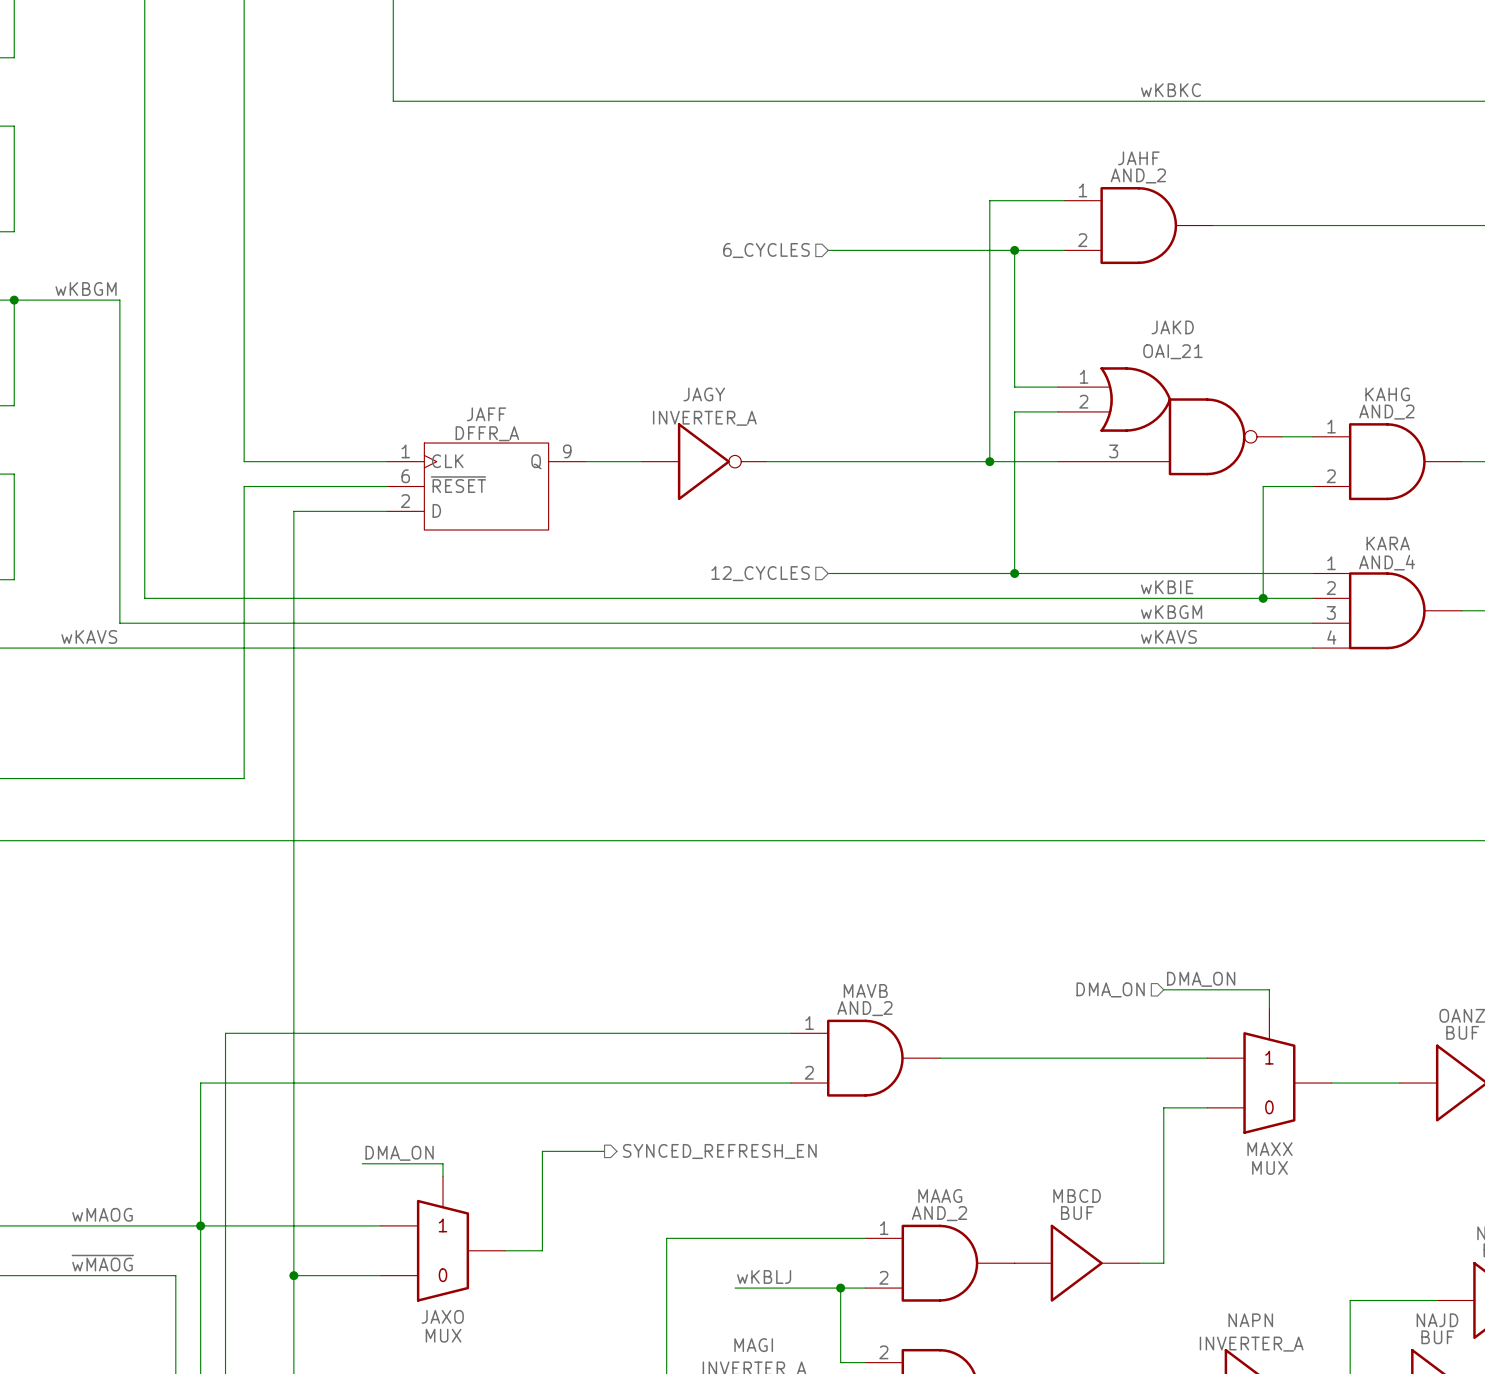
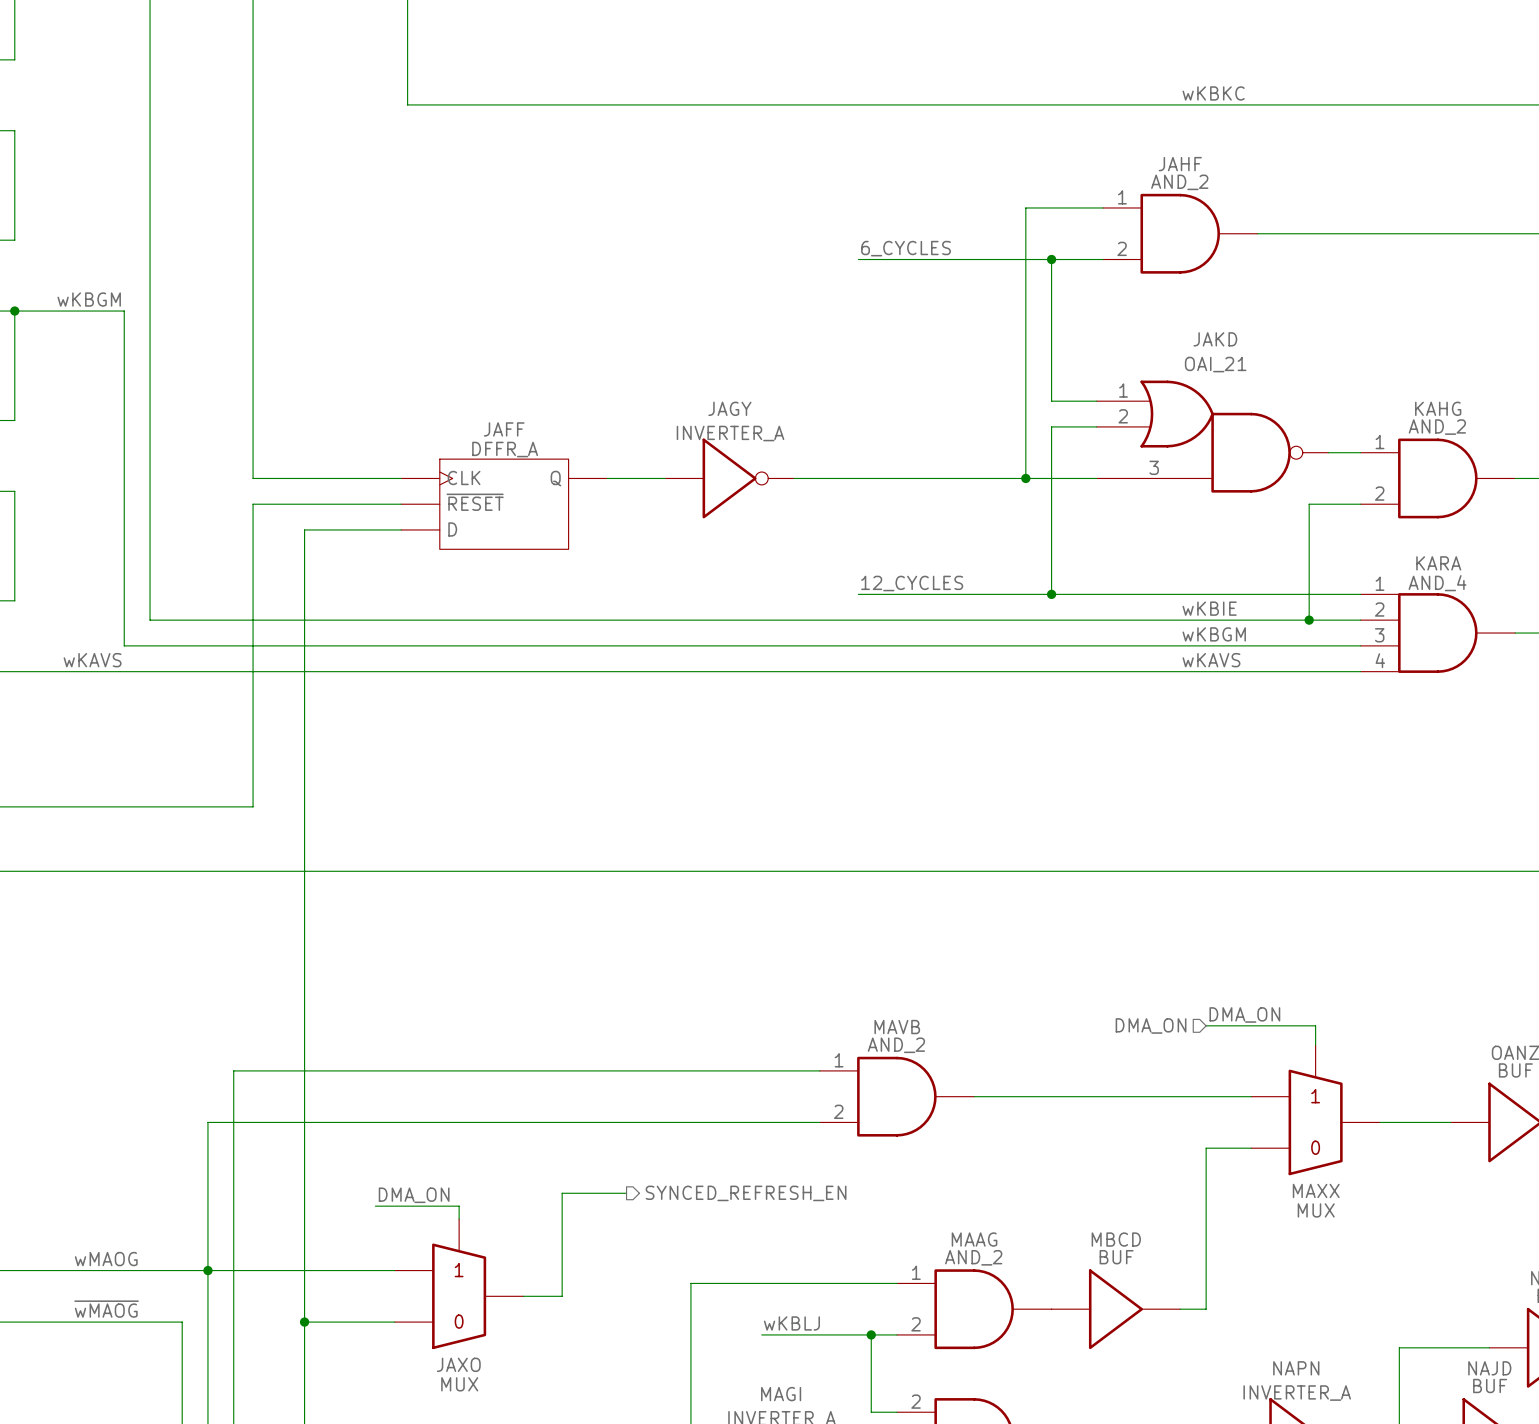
label: none -> 6_CYCLES (906, 248)
hierarchical label: 6_CYCLES (766, 250) -> none
JAFF pin number: 1 (405, 451) -> none
JAFF pin number: 9 (567, 451) -> none
JAFF pin number: 6 (405, 476) -> none
JAFF pin number: 2 (405, 501) -> none
label: none -> 12_CYCLES (912, 583)
hierarchical label: 12_CYCLES (760, 573) -> none

